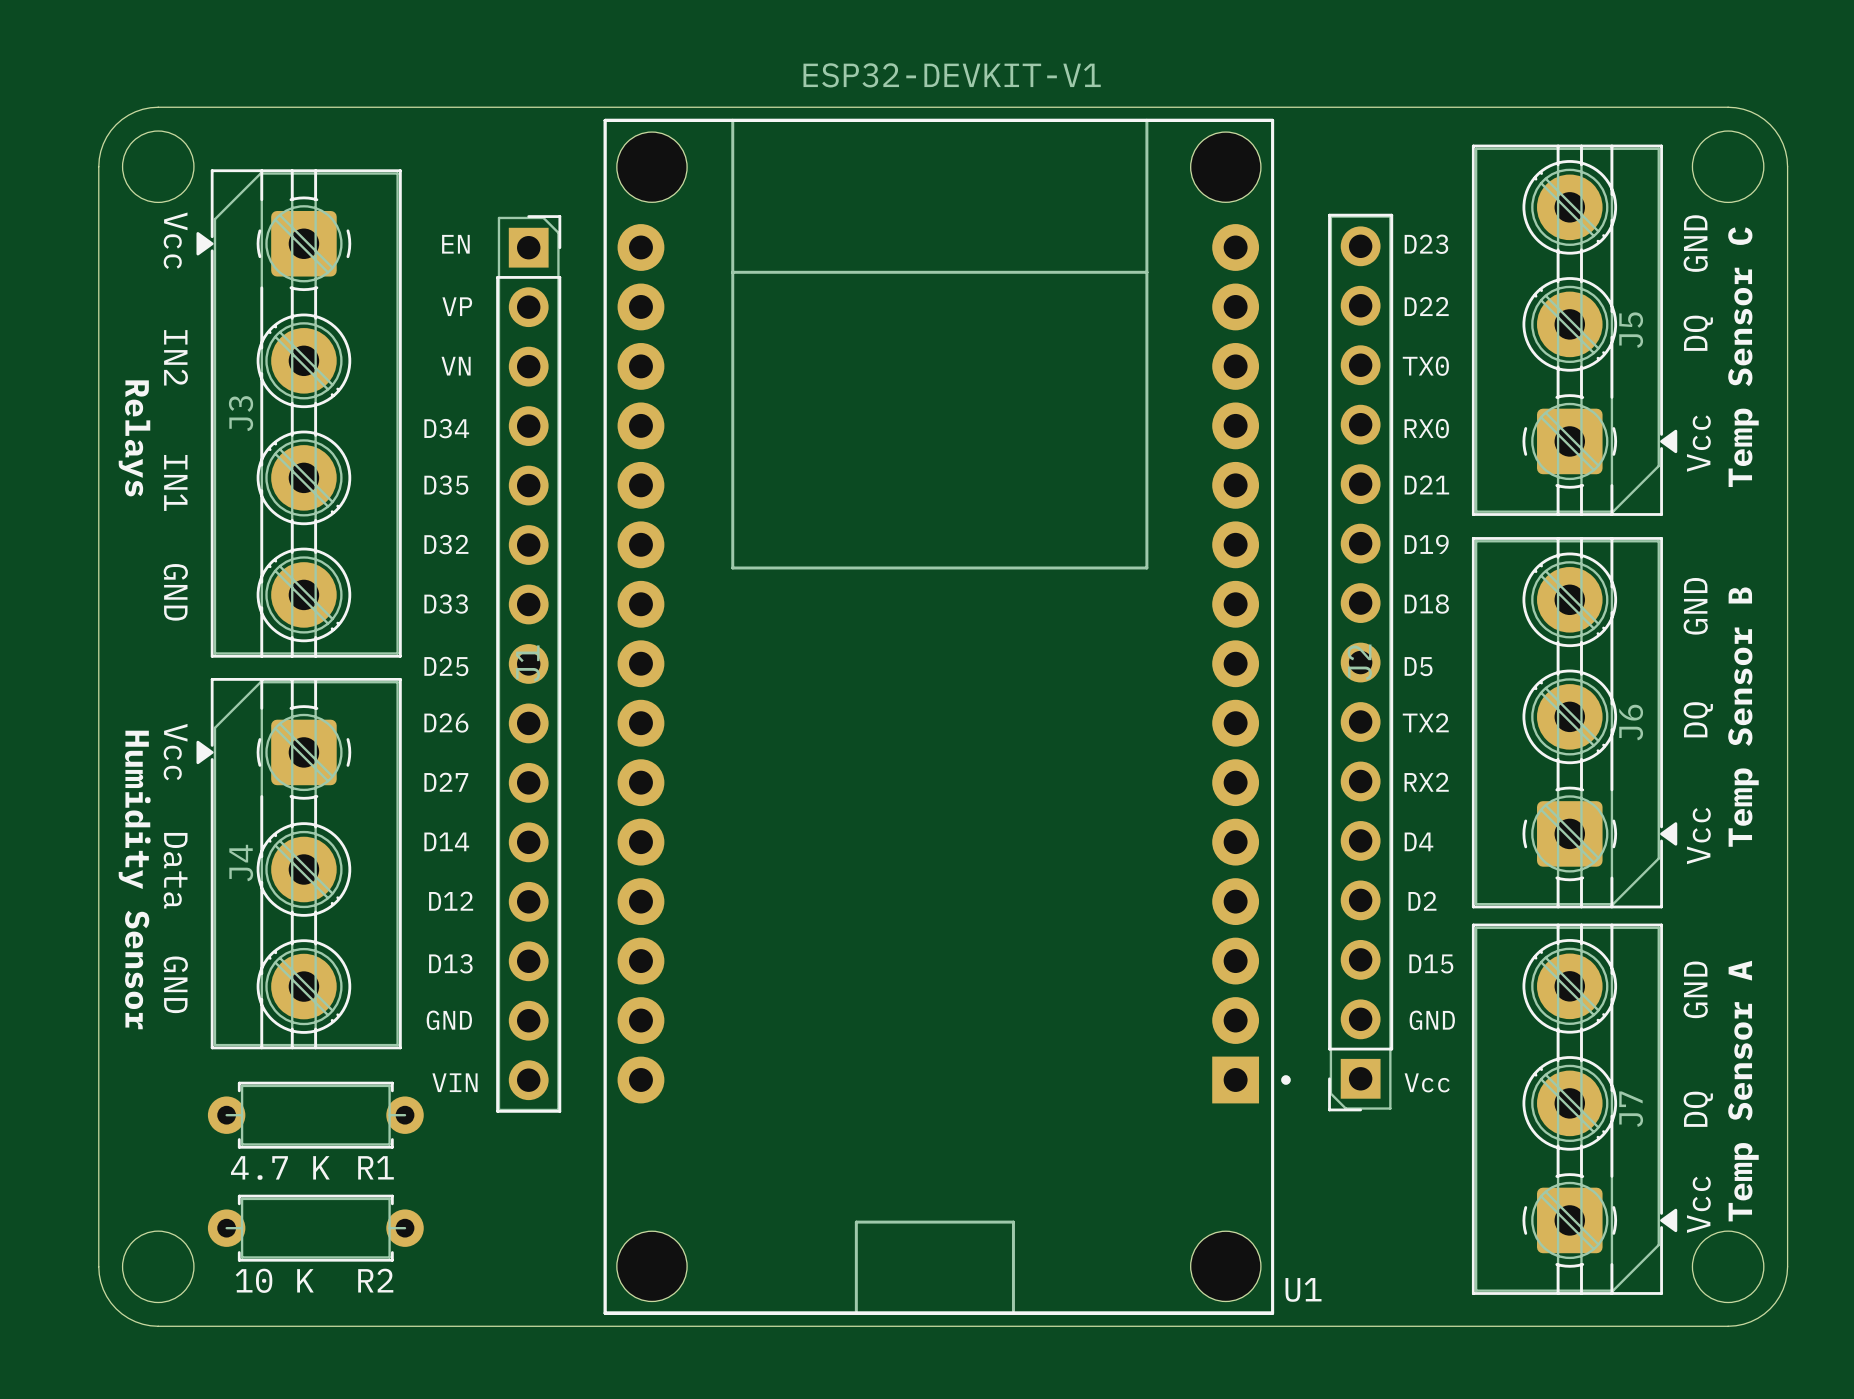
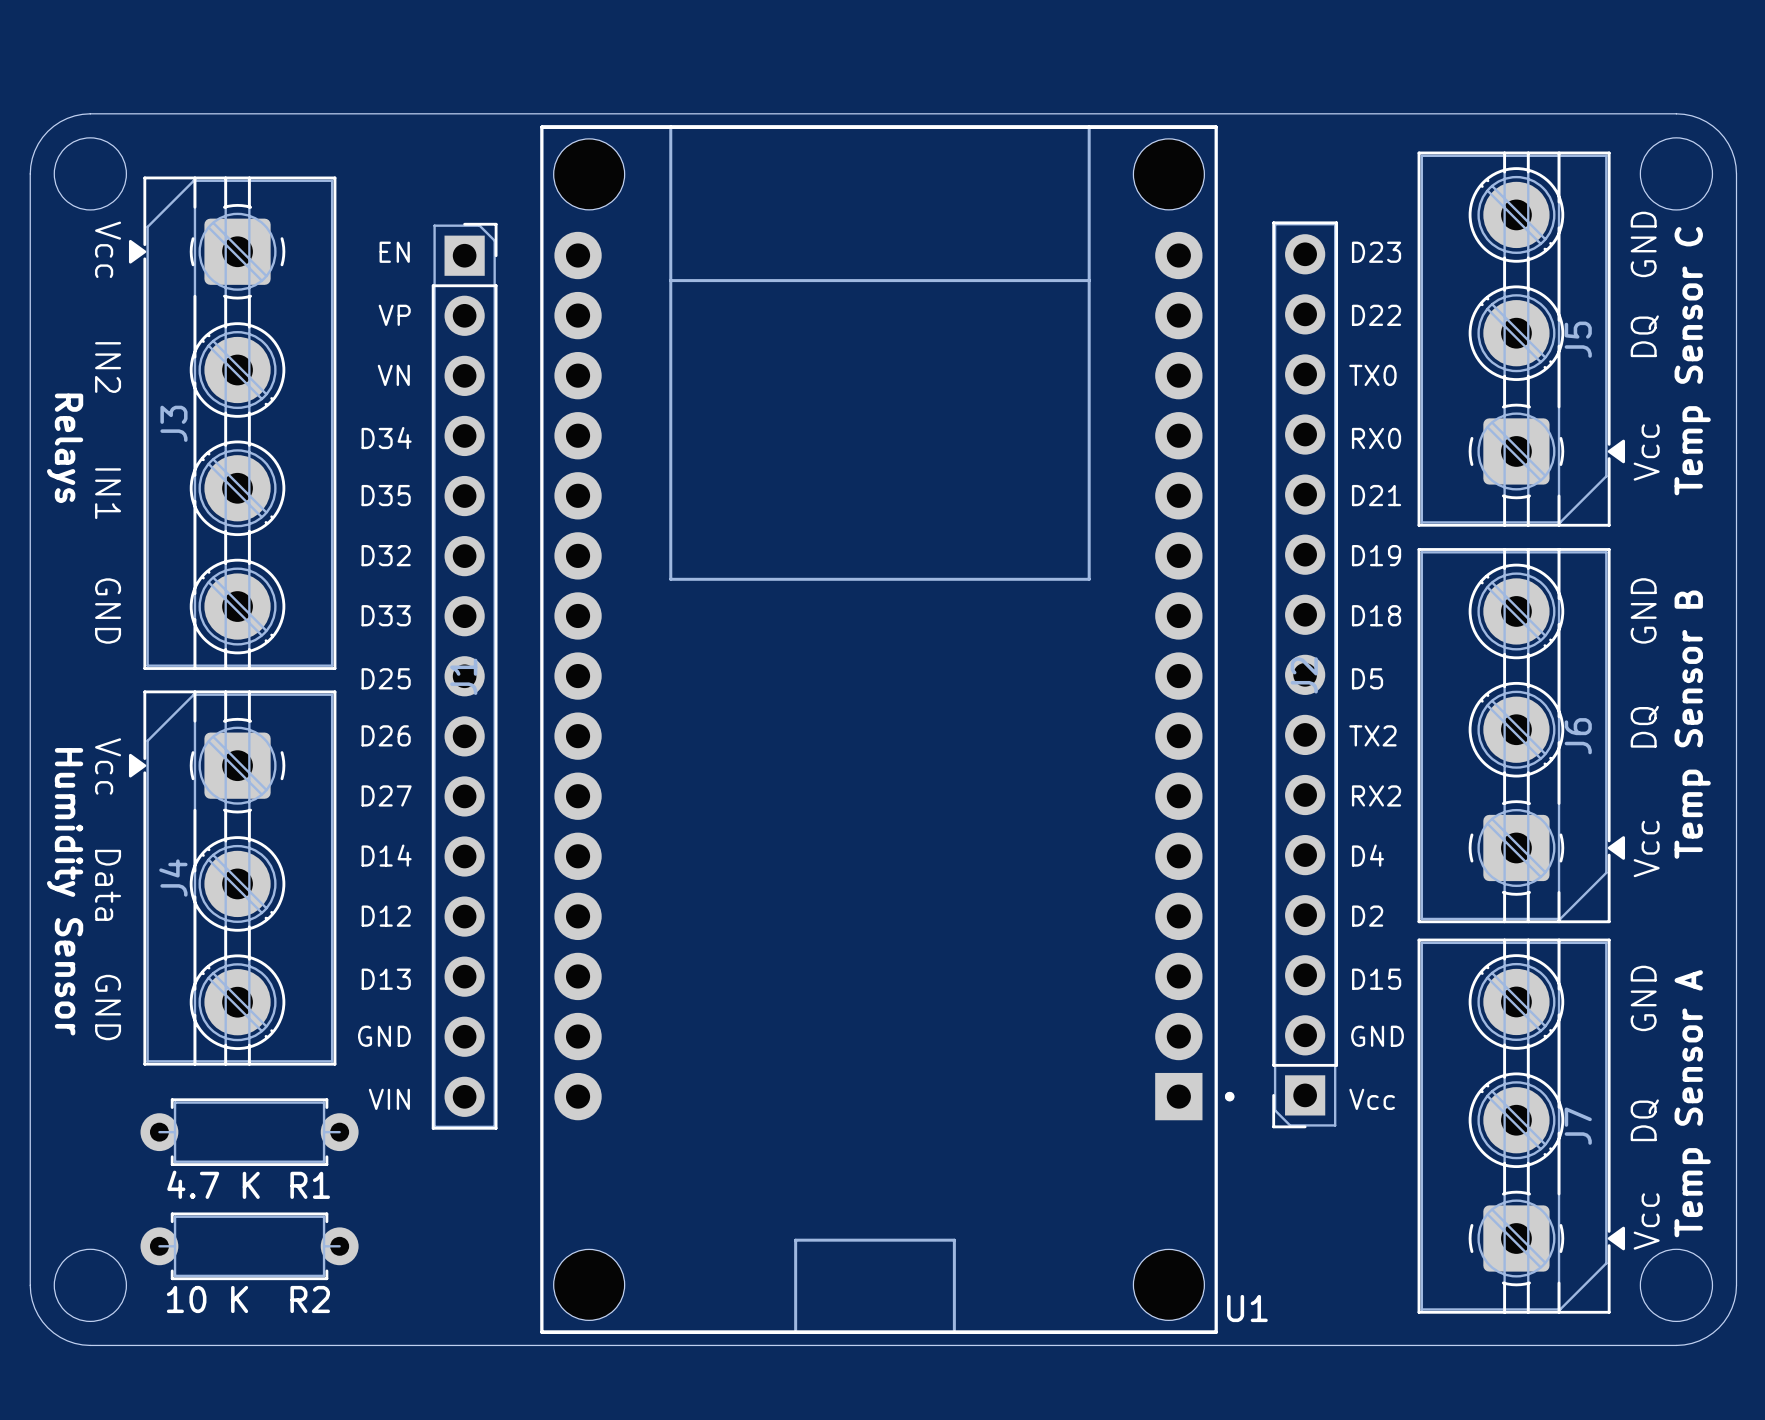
U1 value: ESP32-DEVKIT-V1 (952, 75) -> none

